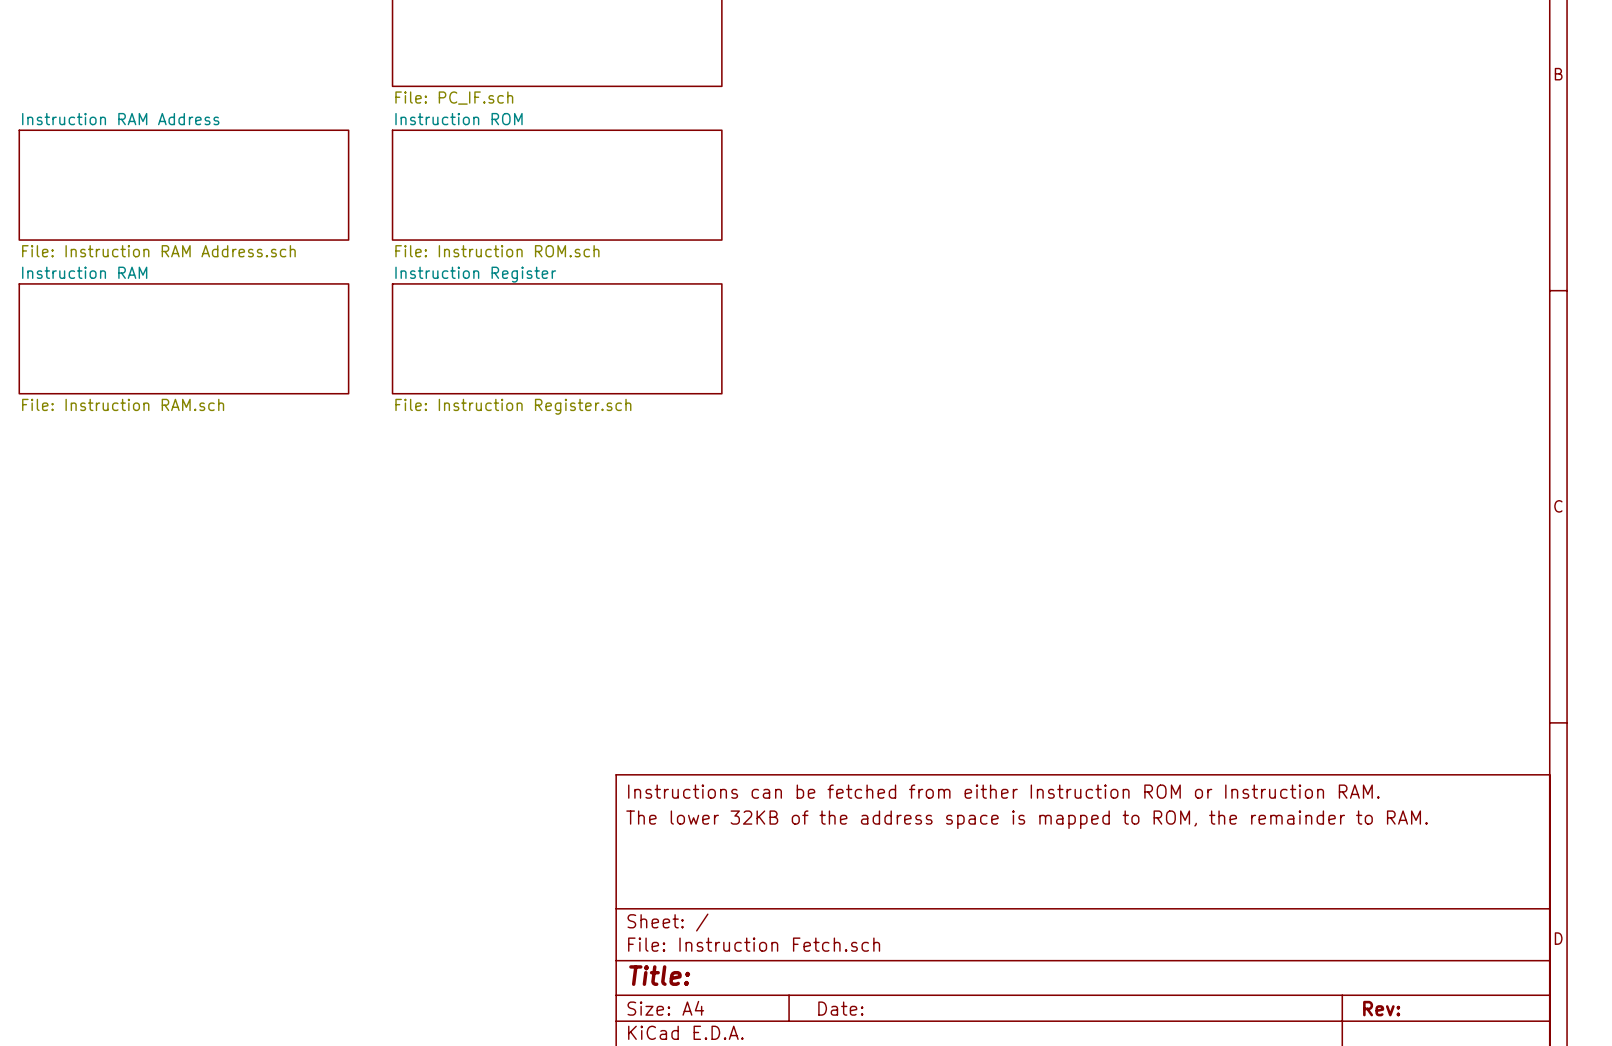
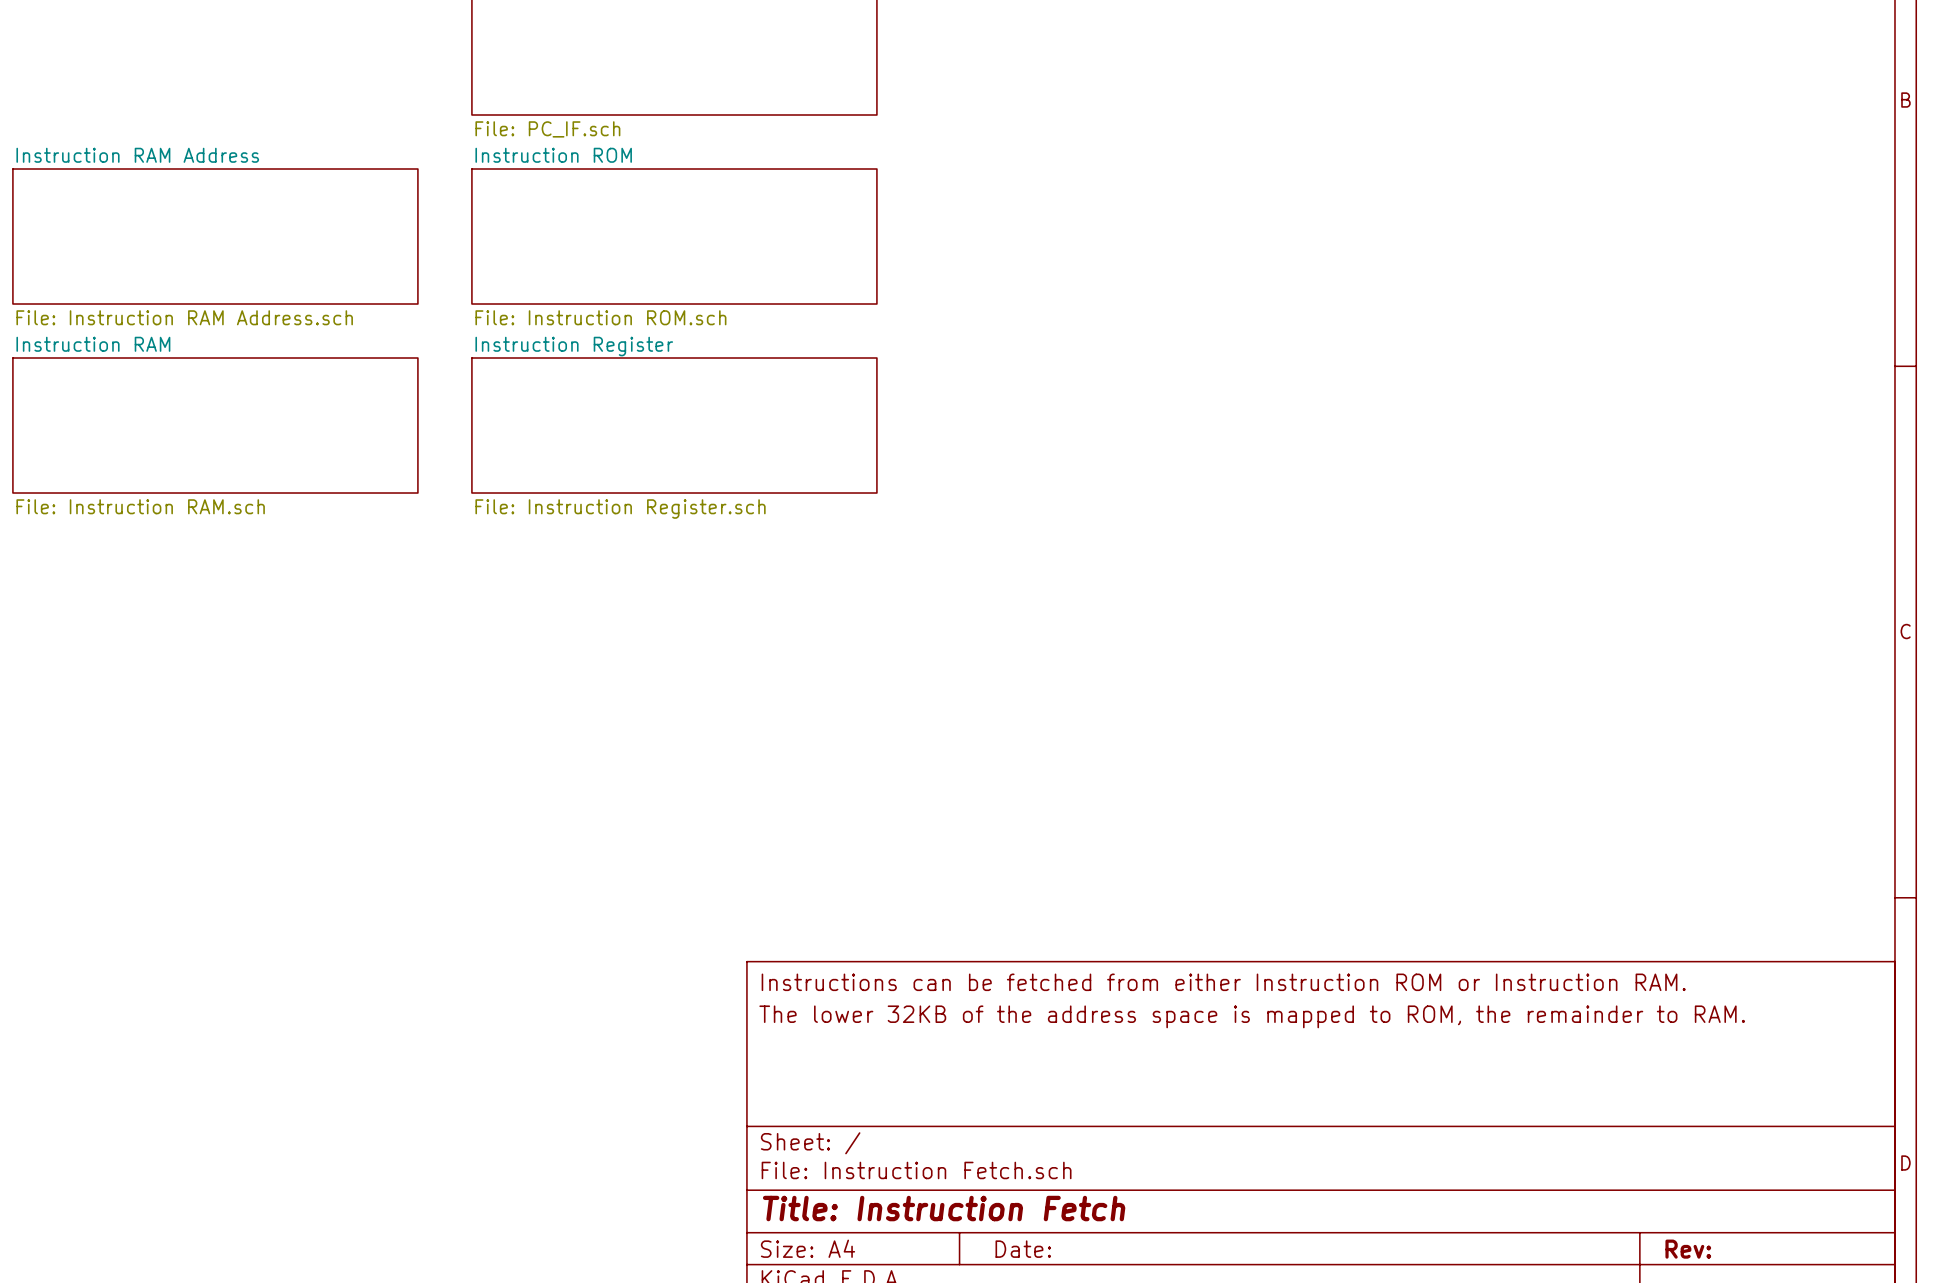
title block: Title: (659, 975) -> Title: Instruction Fetch (944, 1208)

